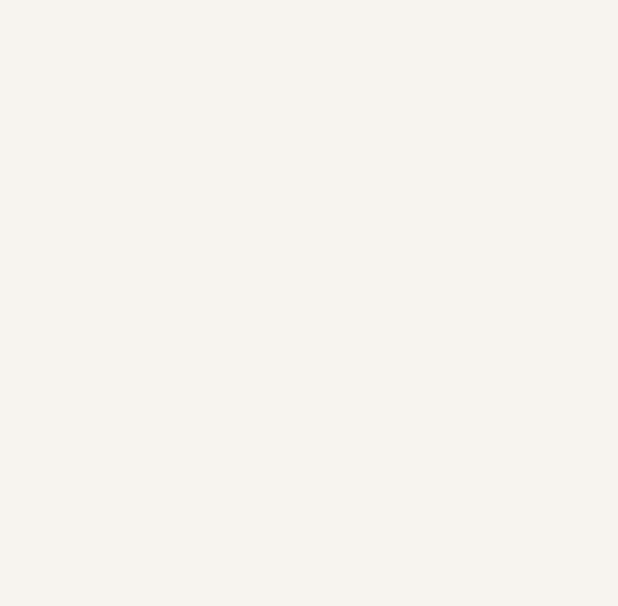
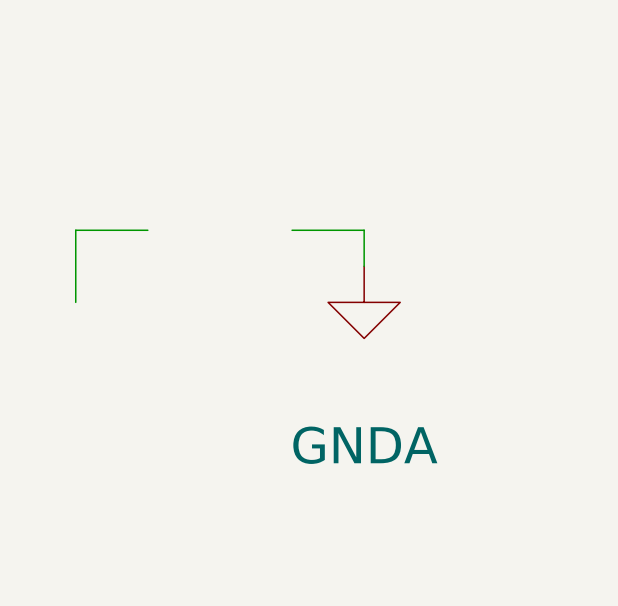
wire: none -> (147, 230) (75, 230) (75, 302)
wire: none -> (292, 230) (364, 230) (364, 266)
power symbol: none -> GNDA (364, 302)

